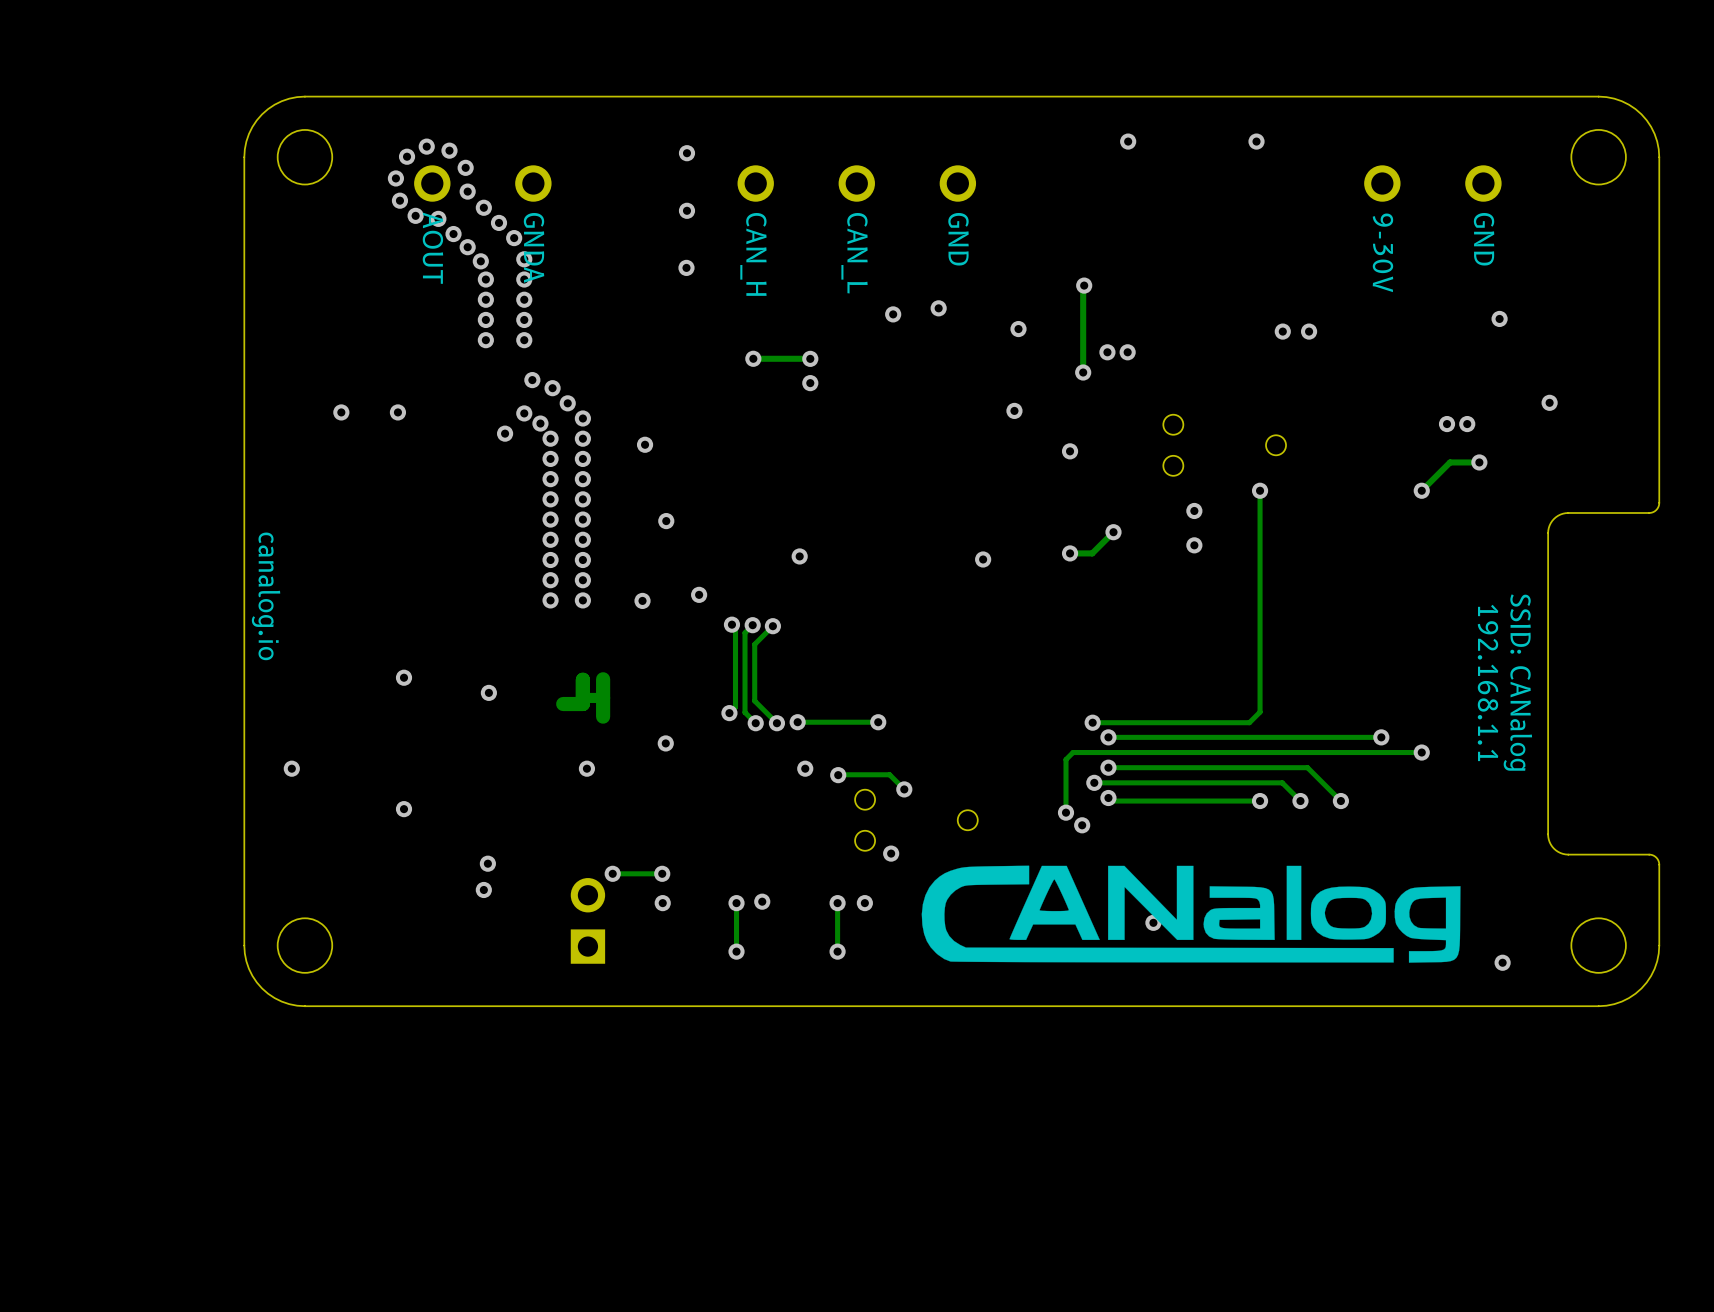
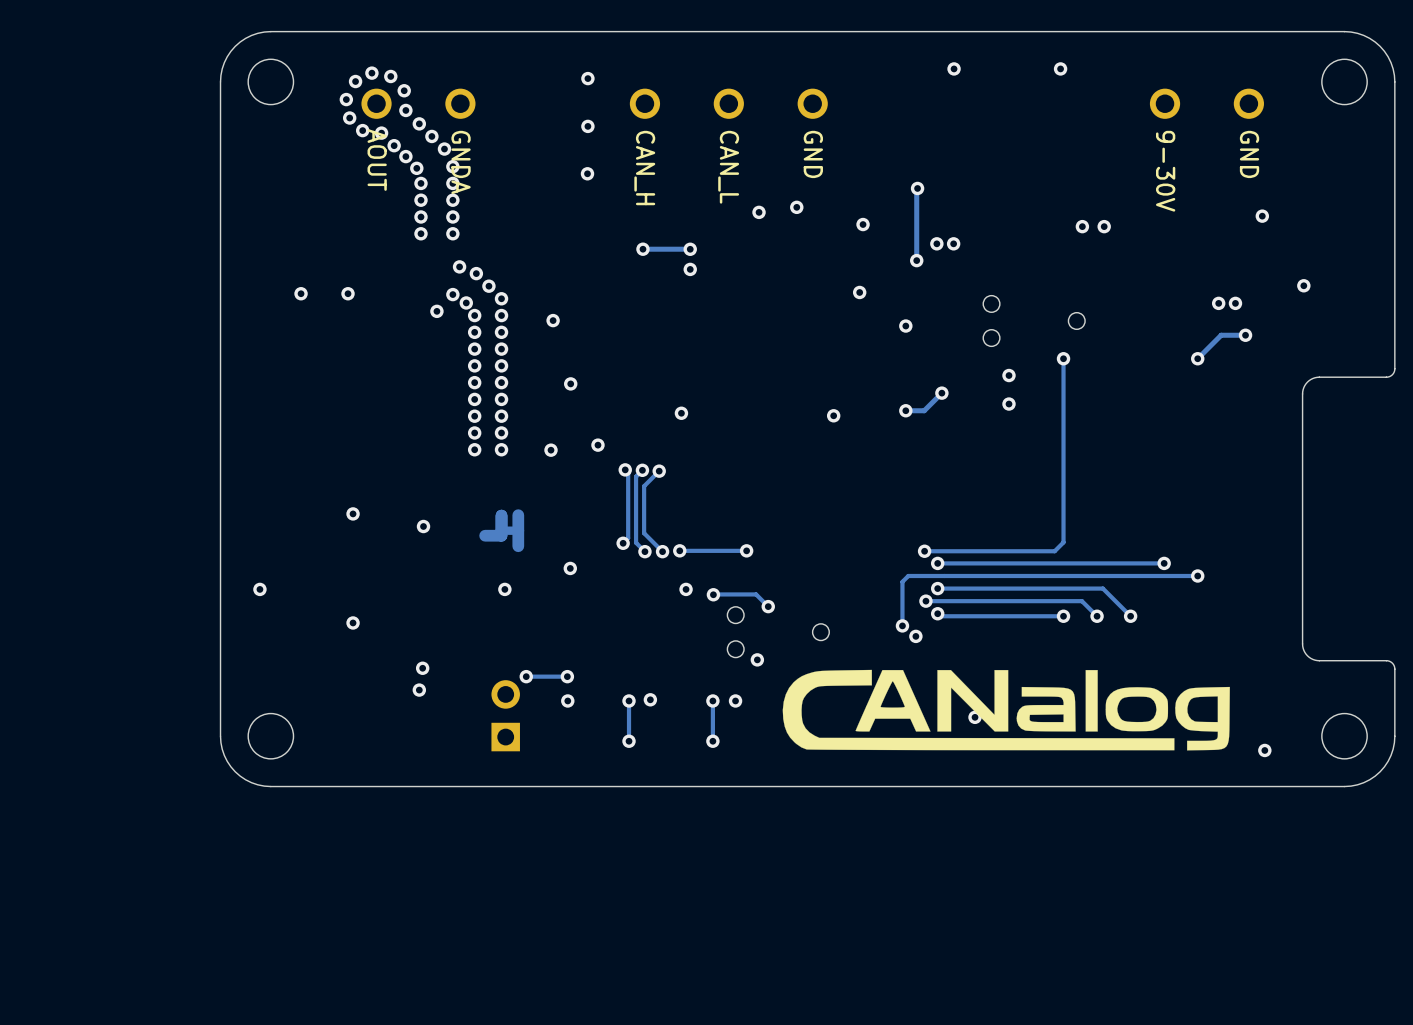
text: canalog.io (266, 596) -> none
text: 192.168.1.1 (1488, 682) -> none
text: SSID: CANalog (1517, 682) -> none

